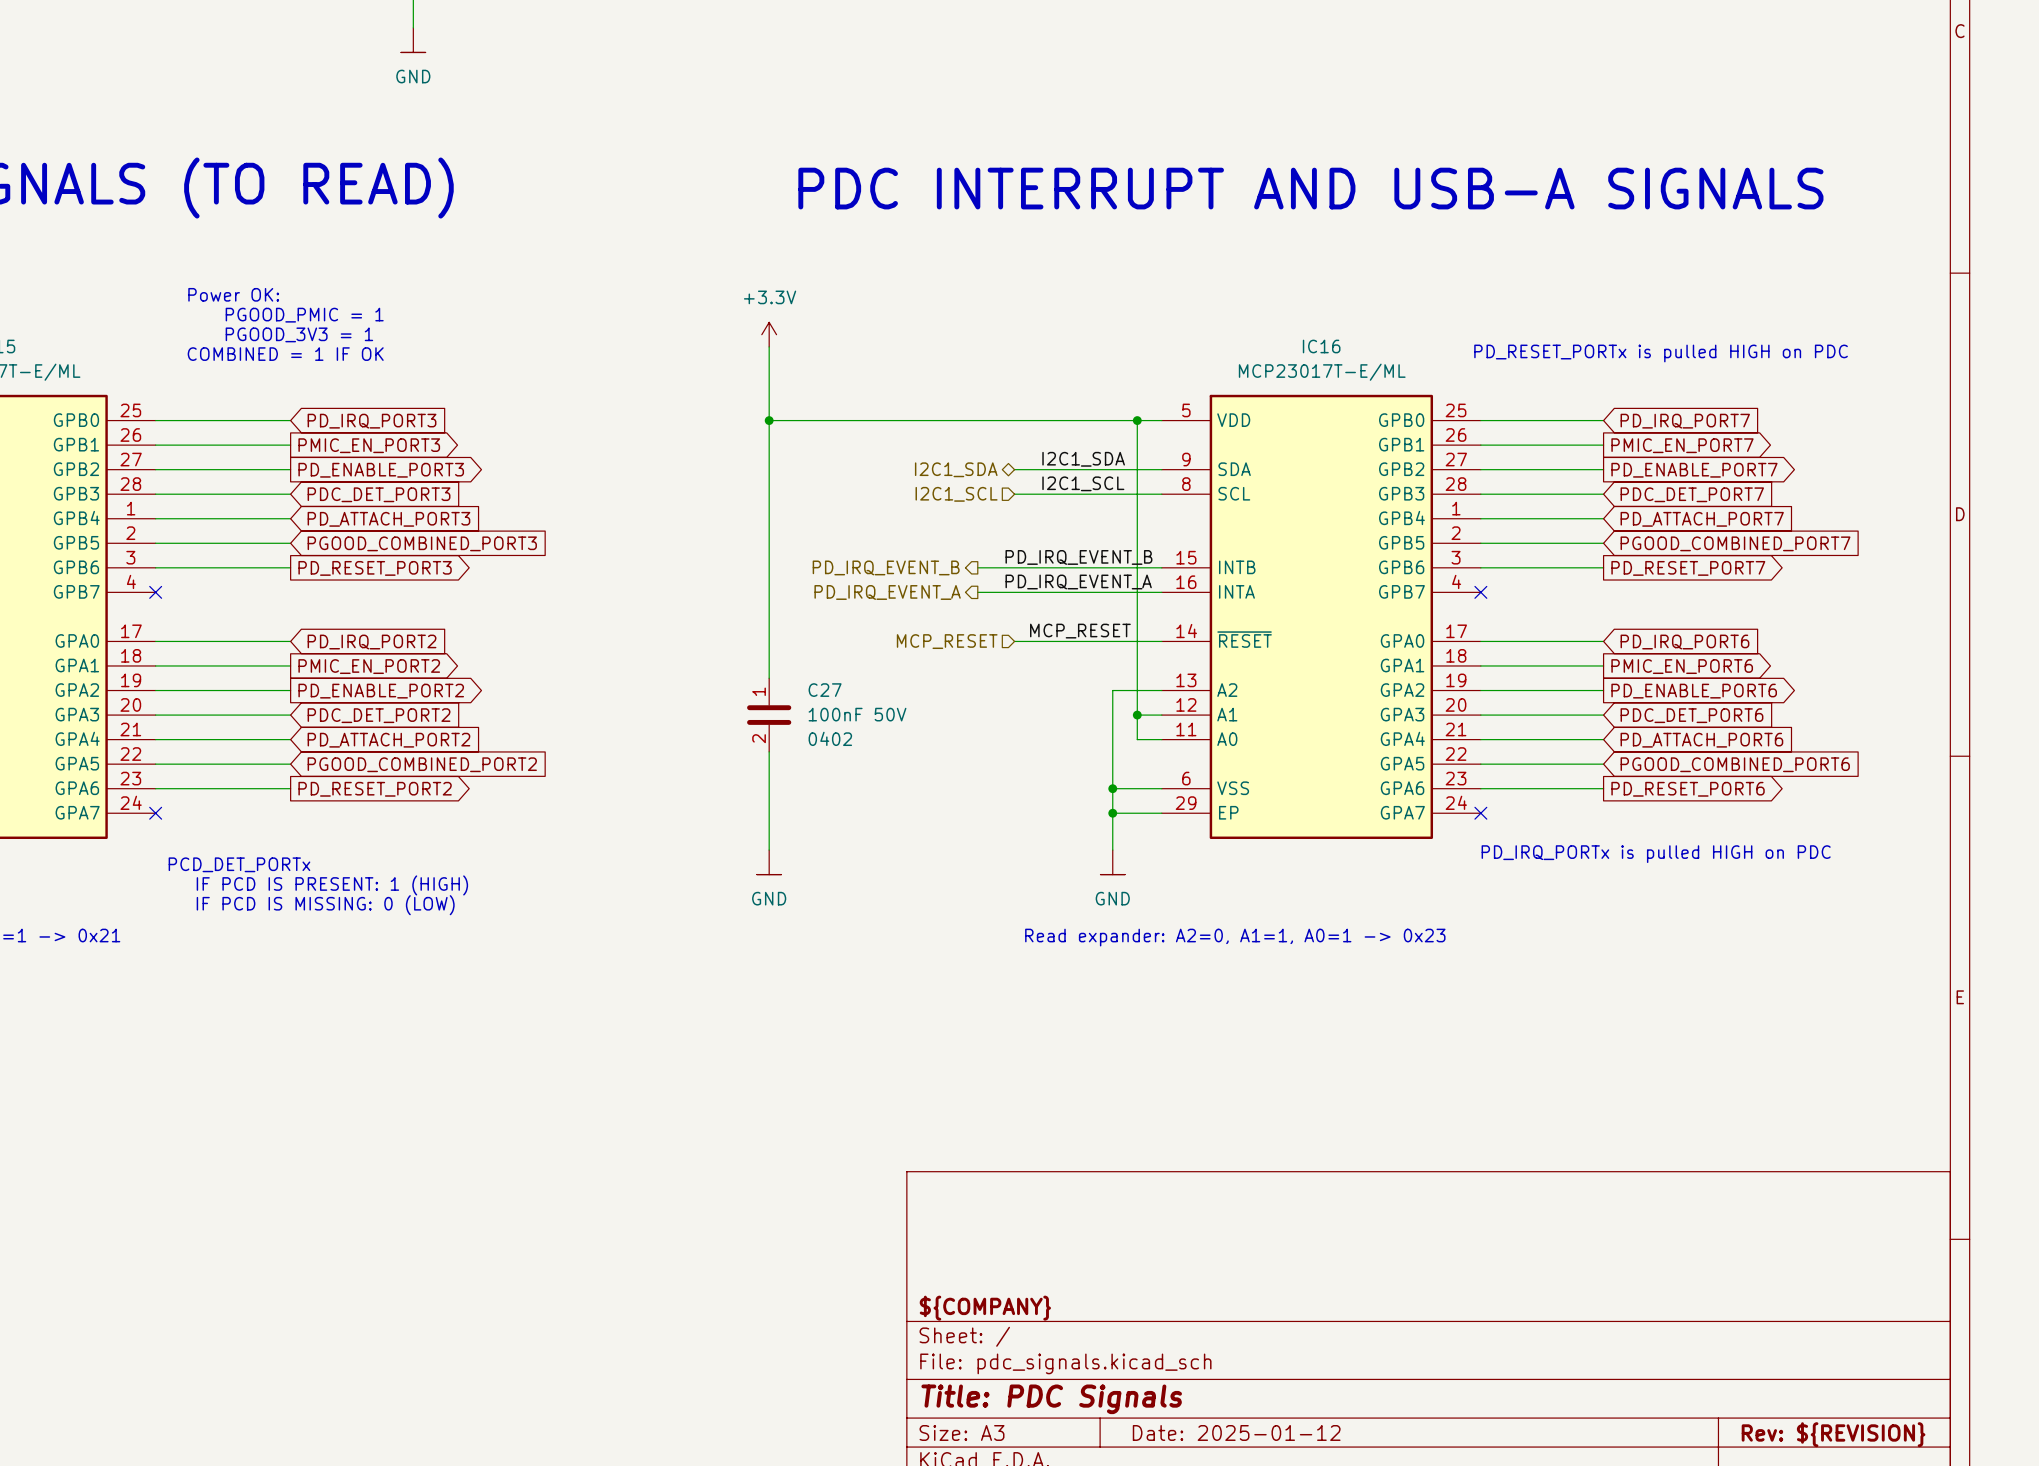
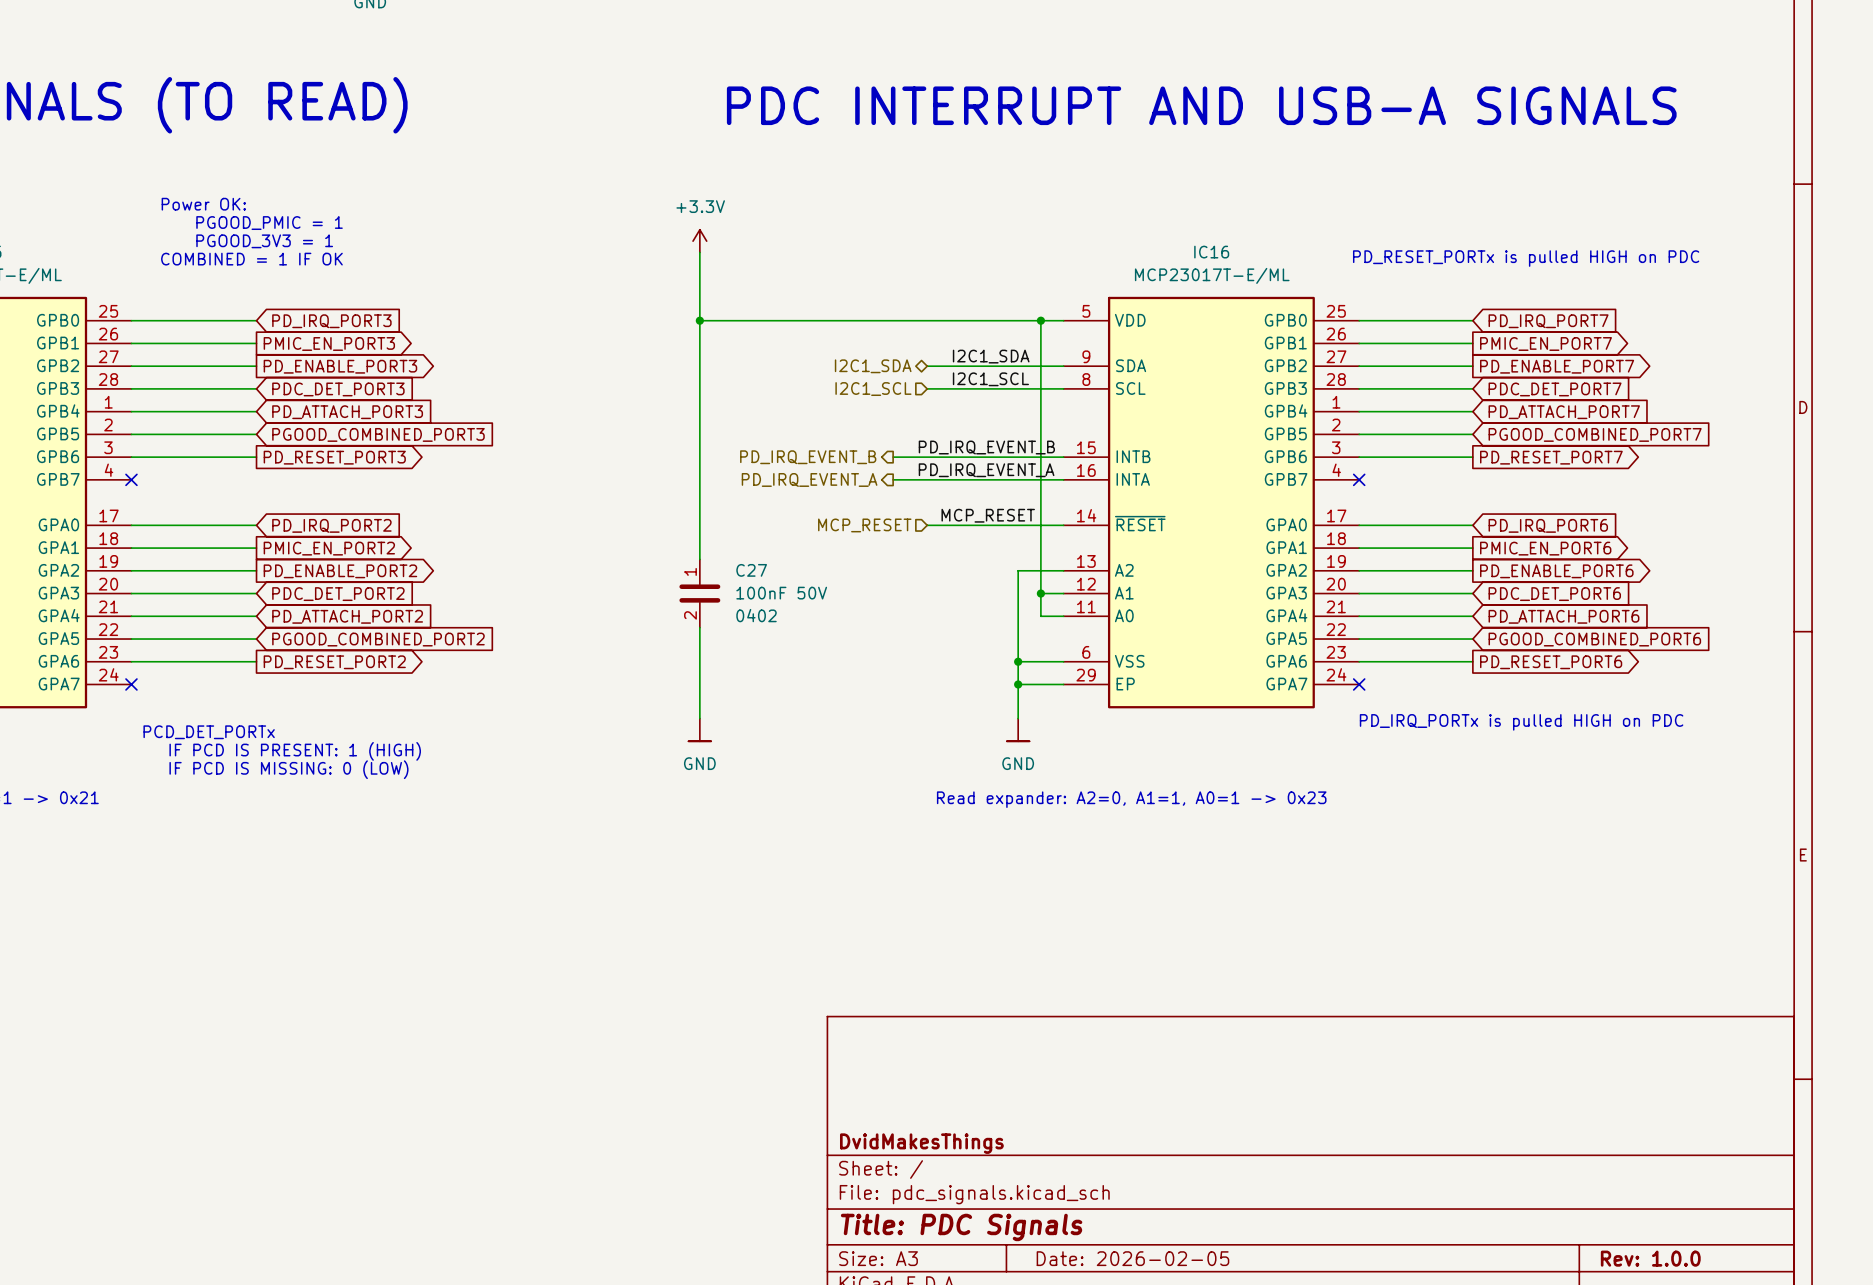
title block: ${COMPANY} (985, 1308) -> DvidMakesThings (921, 1143)
title block: Date: 2025-01-12 (1236, 1432) -> Date: 2026-02-05 (1132, 1258)
title block: Rev: ${REVISION} (1833, 1434) -> Rev: 1.0.0 (1650, 1258)

